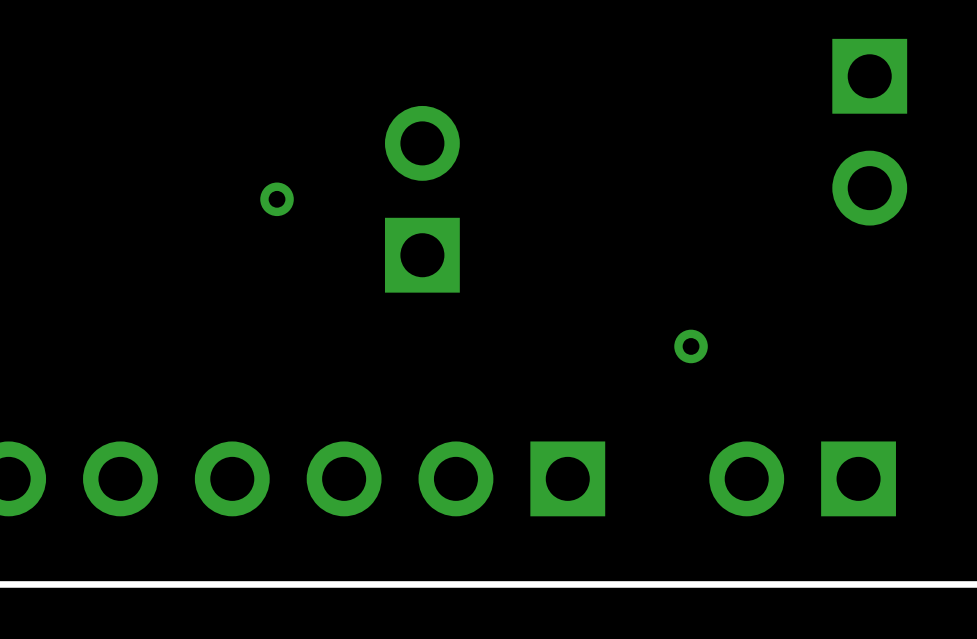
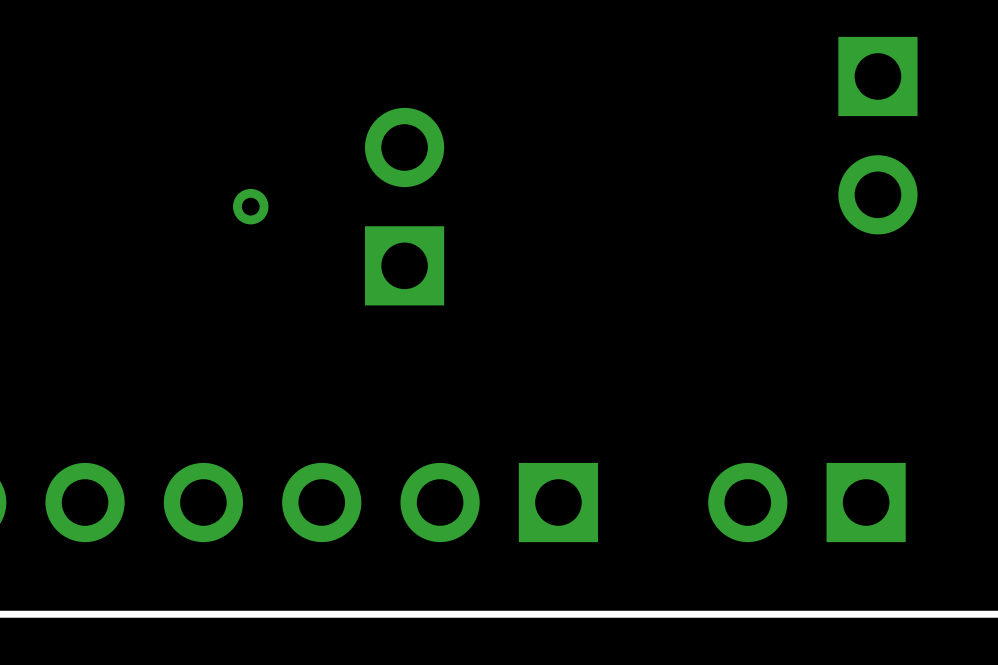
via: (691, 346) -> none

